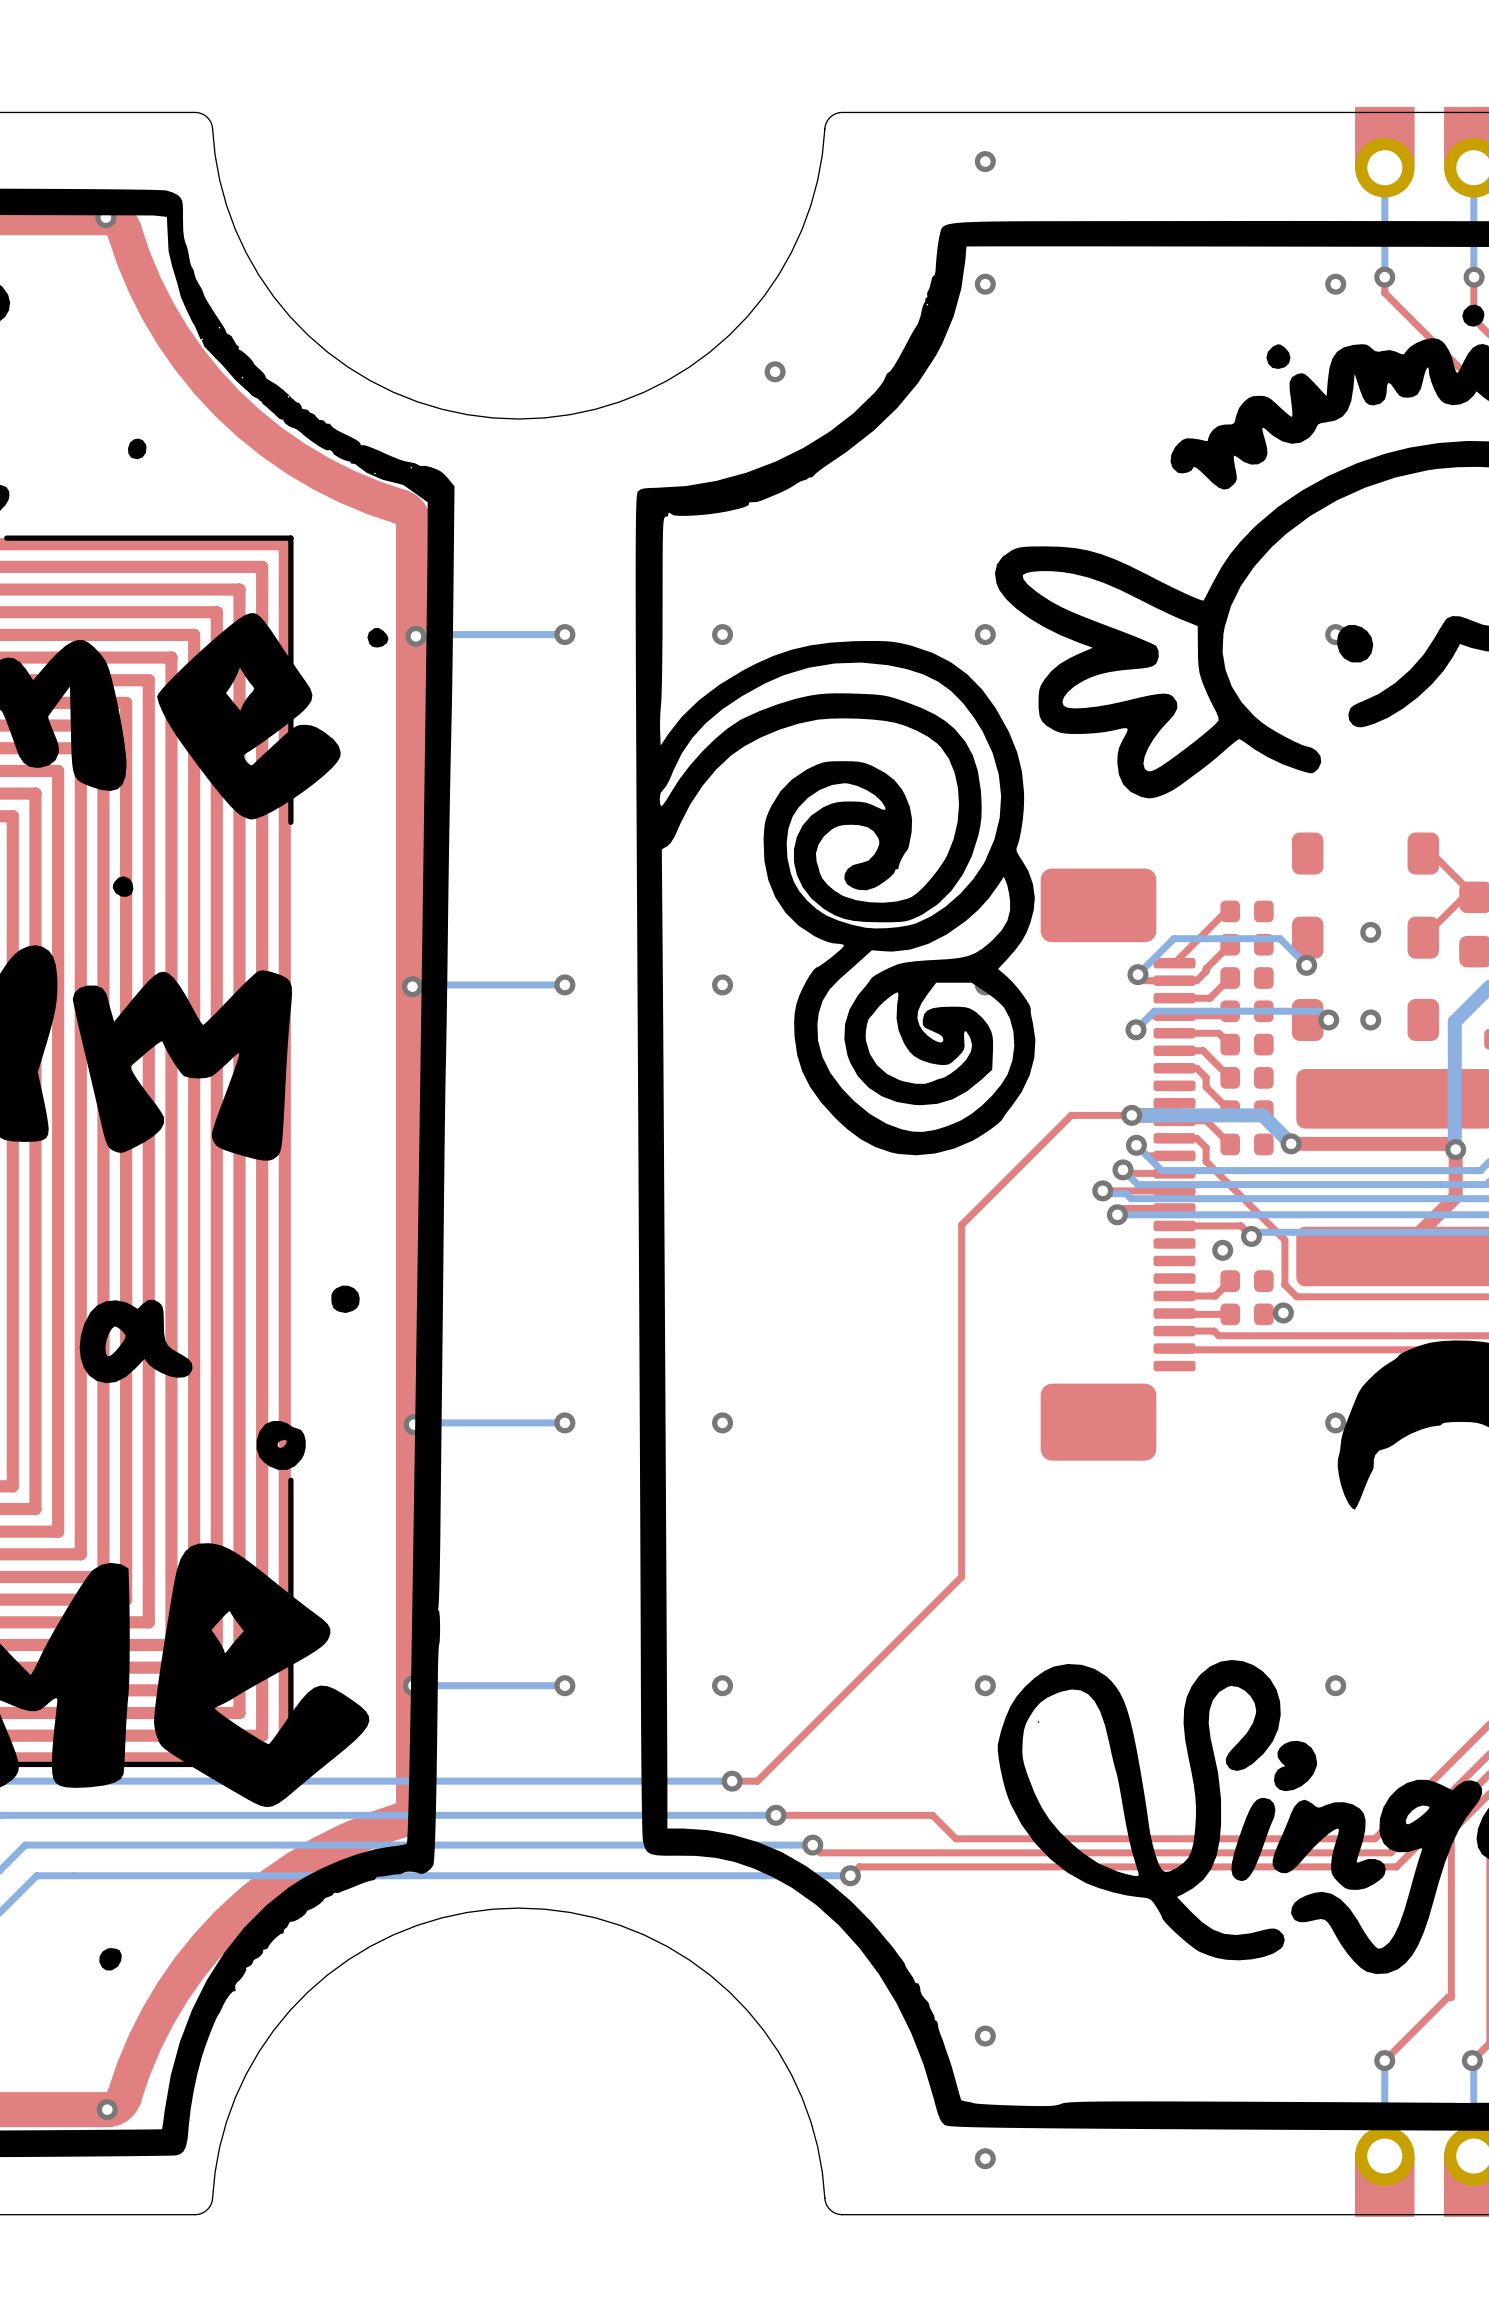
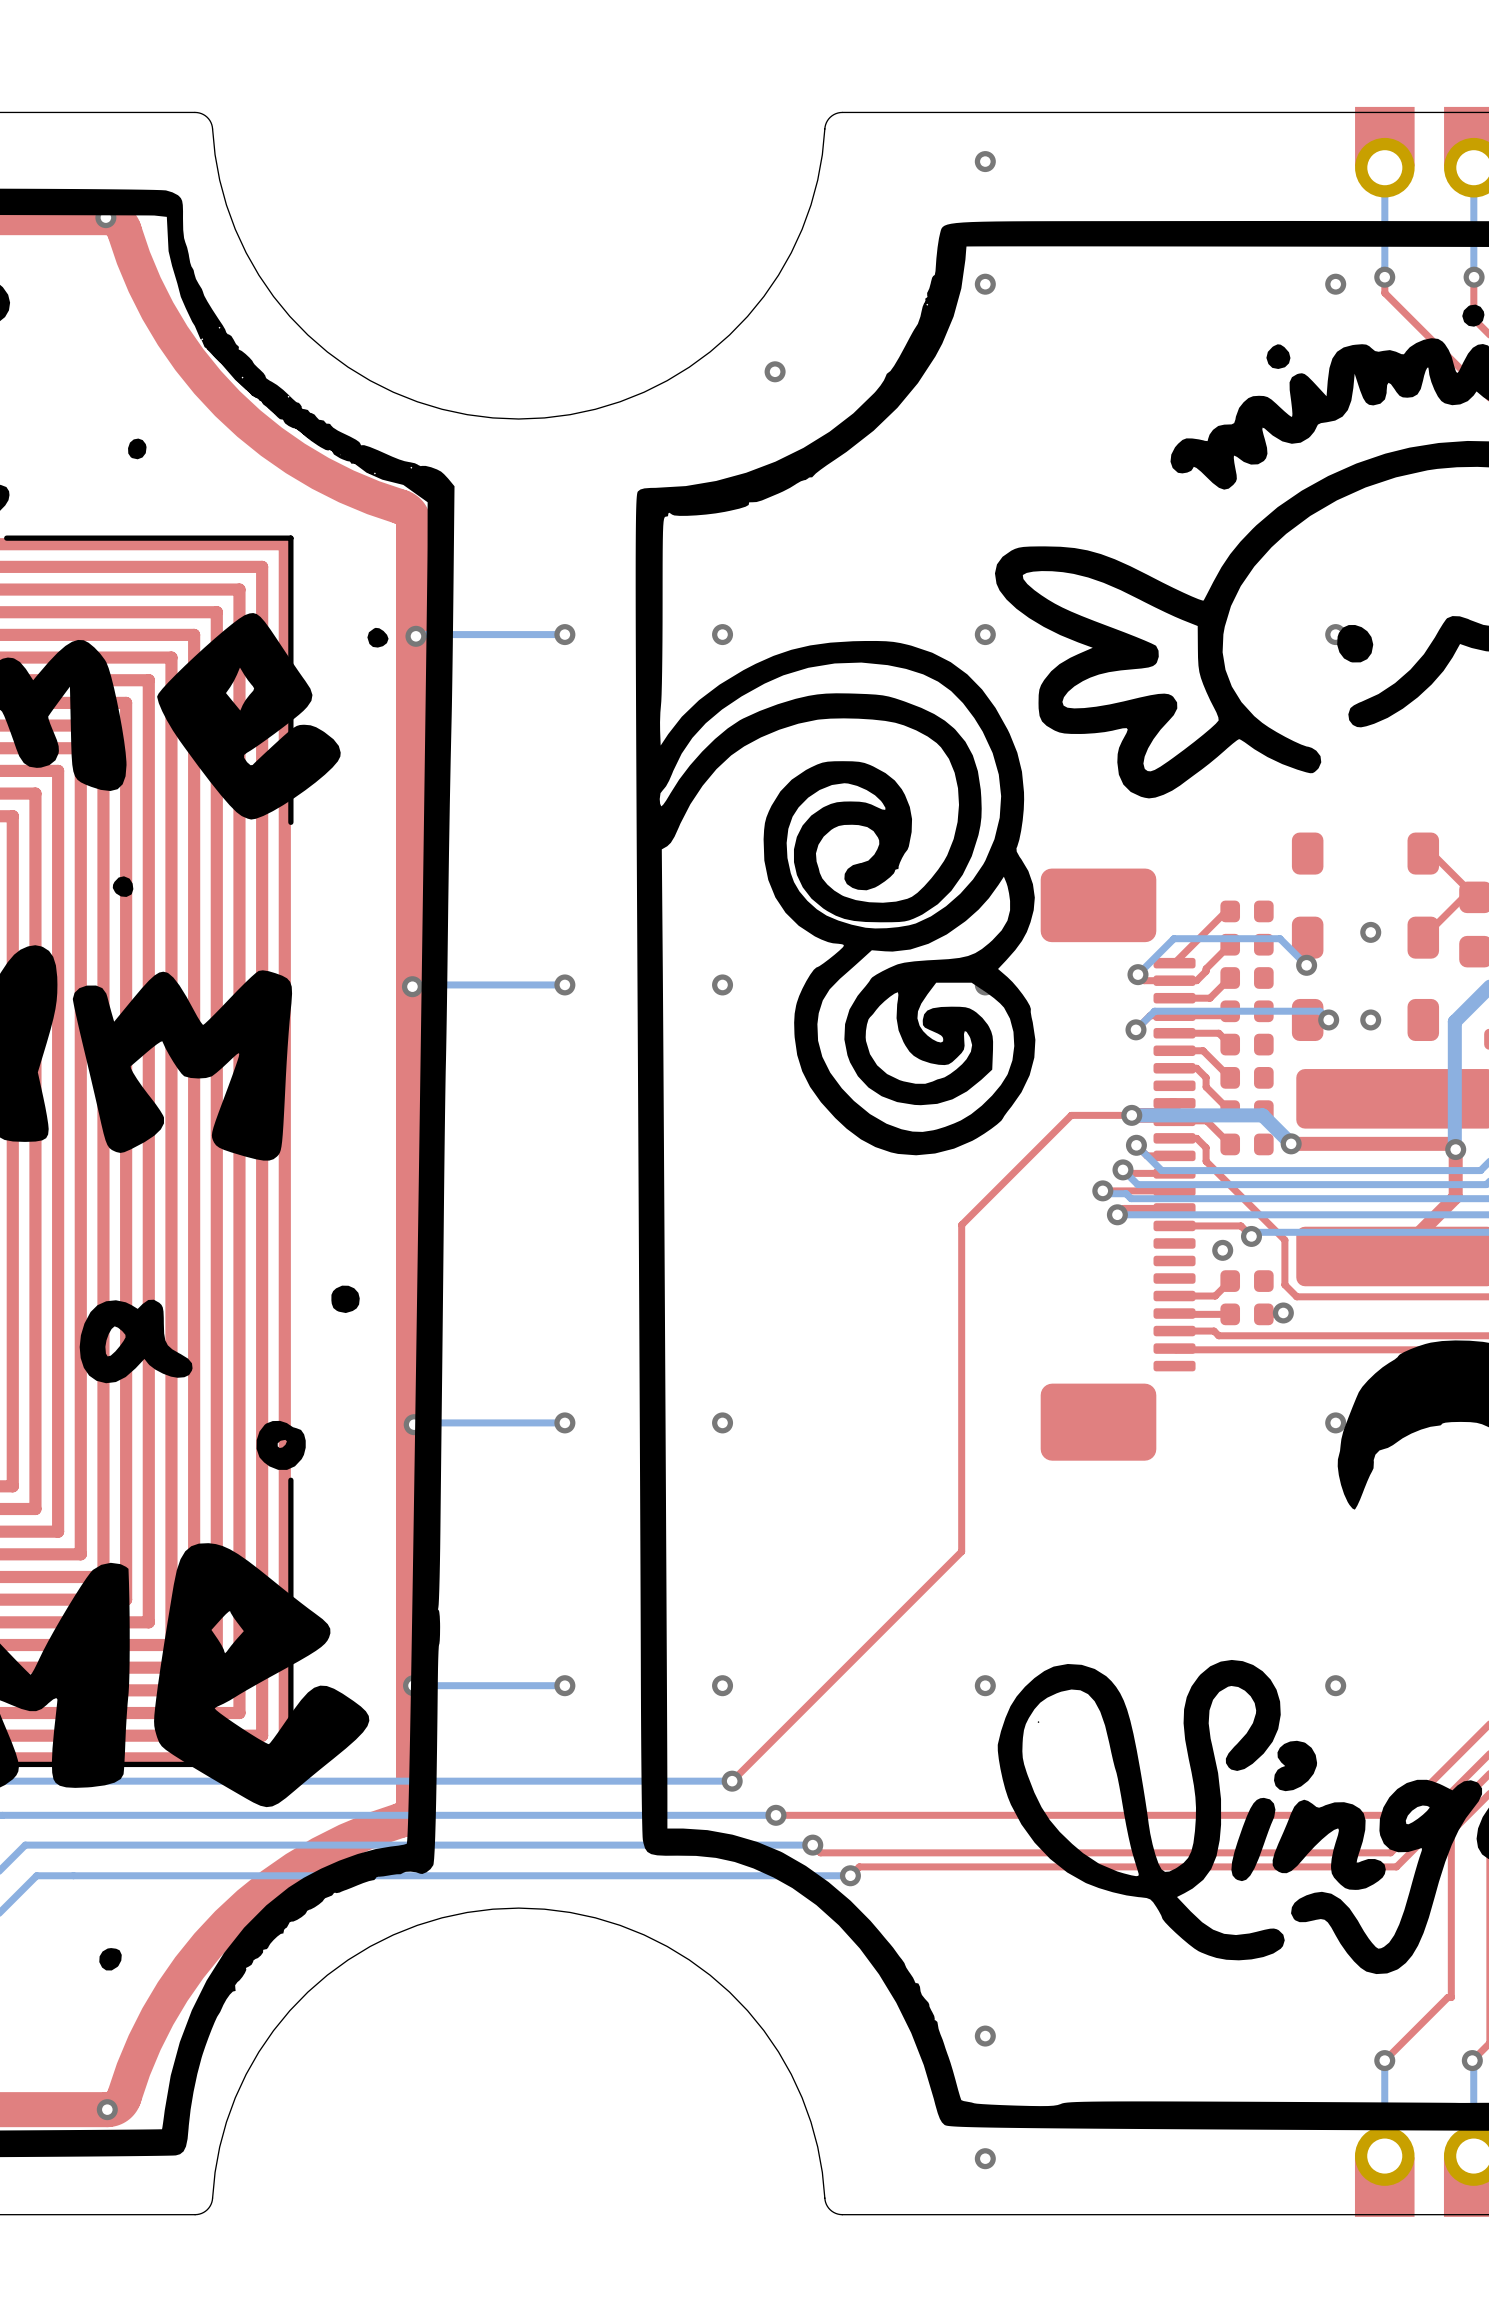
top track: (961, 1551) (961, 1576) (757, 1781) (732, 1781) -> (961, 1551) (732, 1781)
top track: (1398, 1815) (1375, 1838) (955, 1838) (932, 1815) -> (1398, 1815) (932, 1815)

